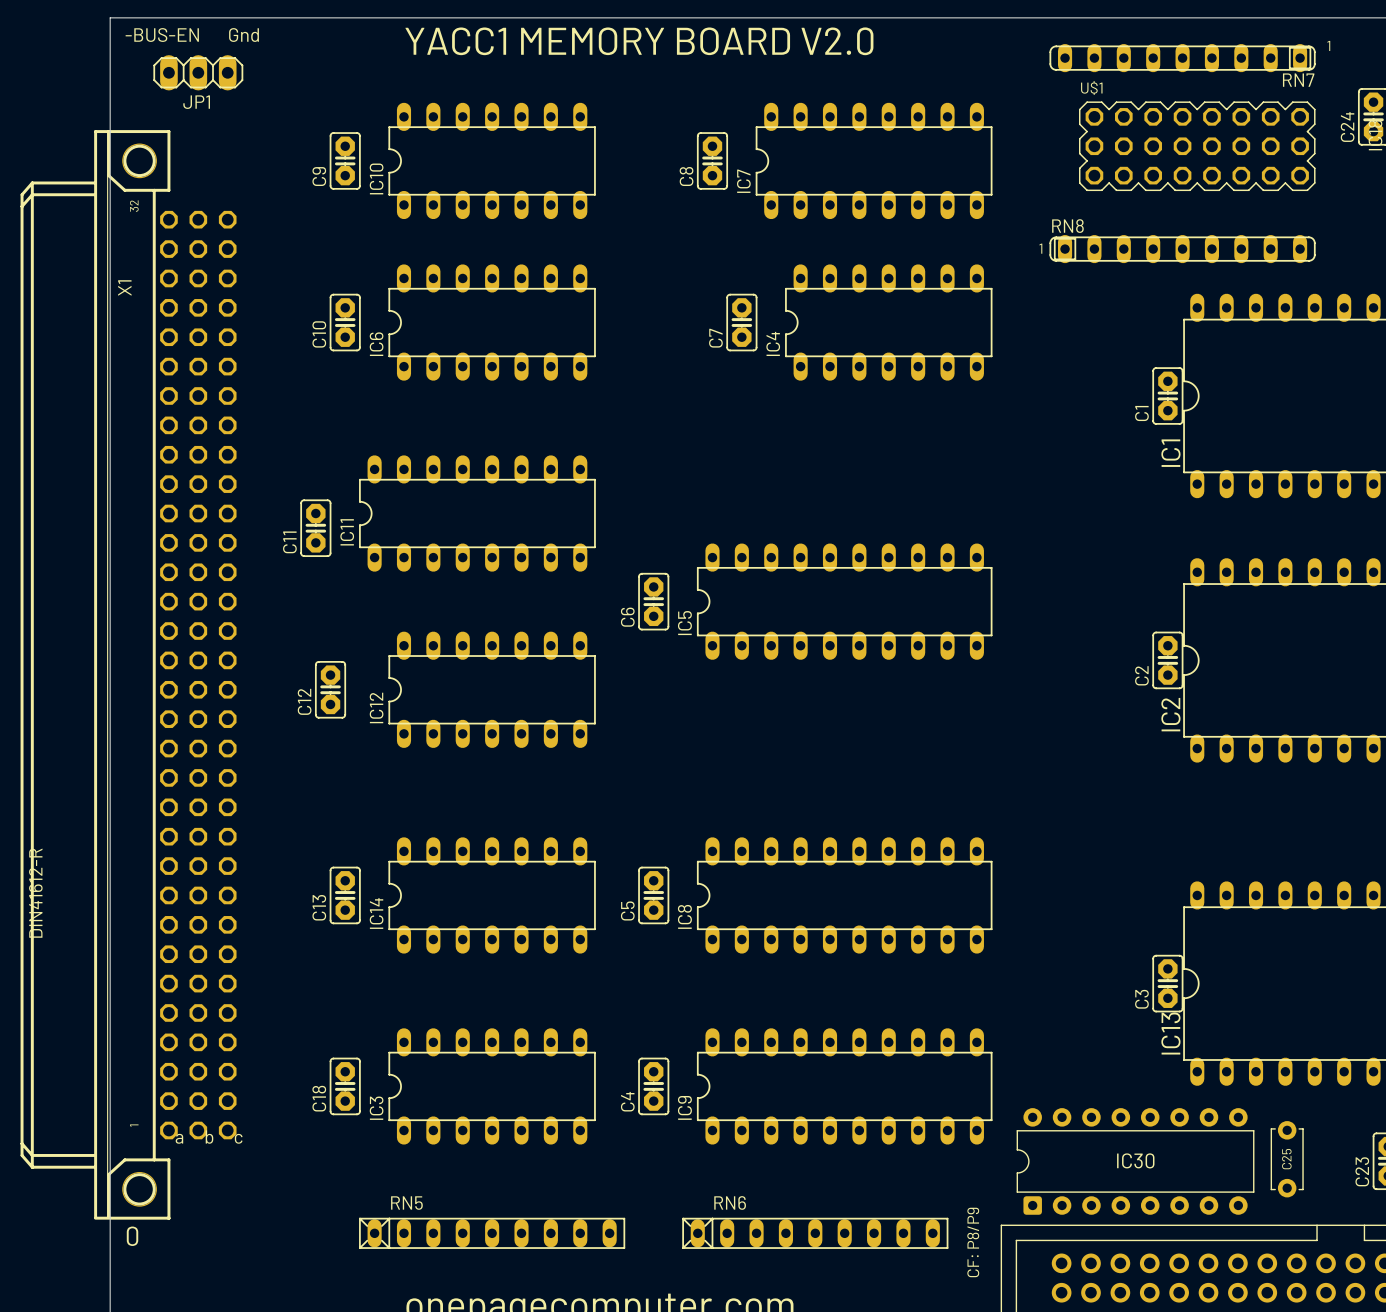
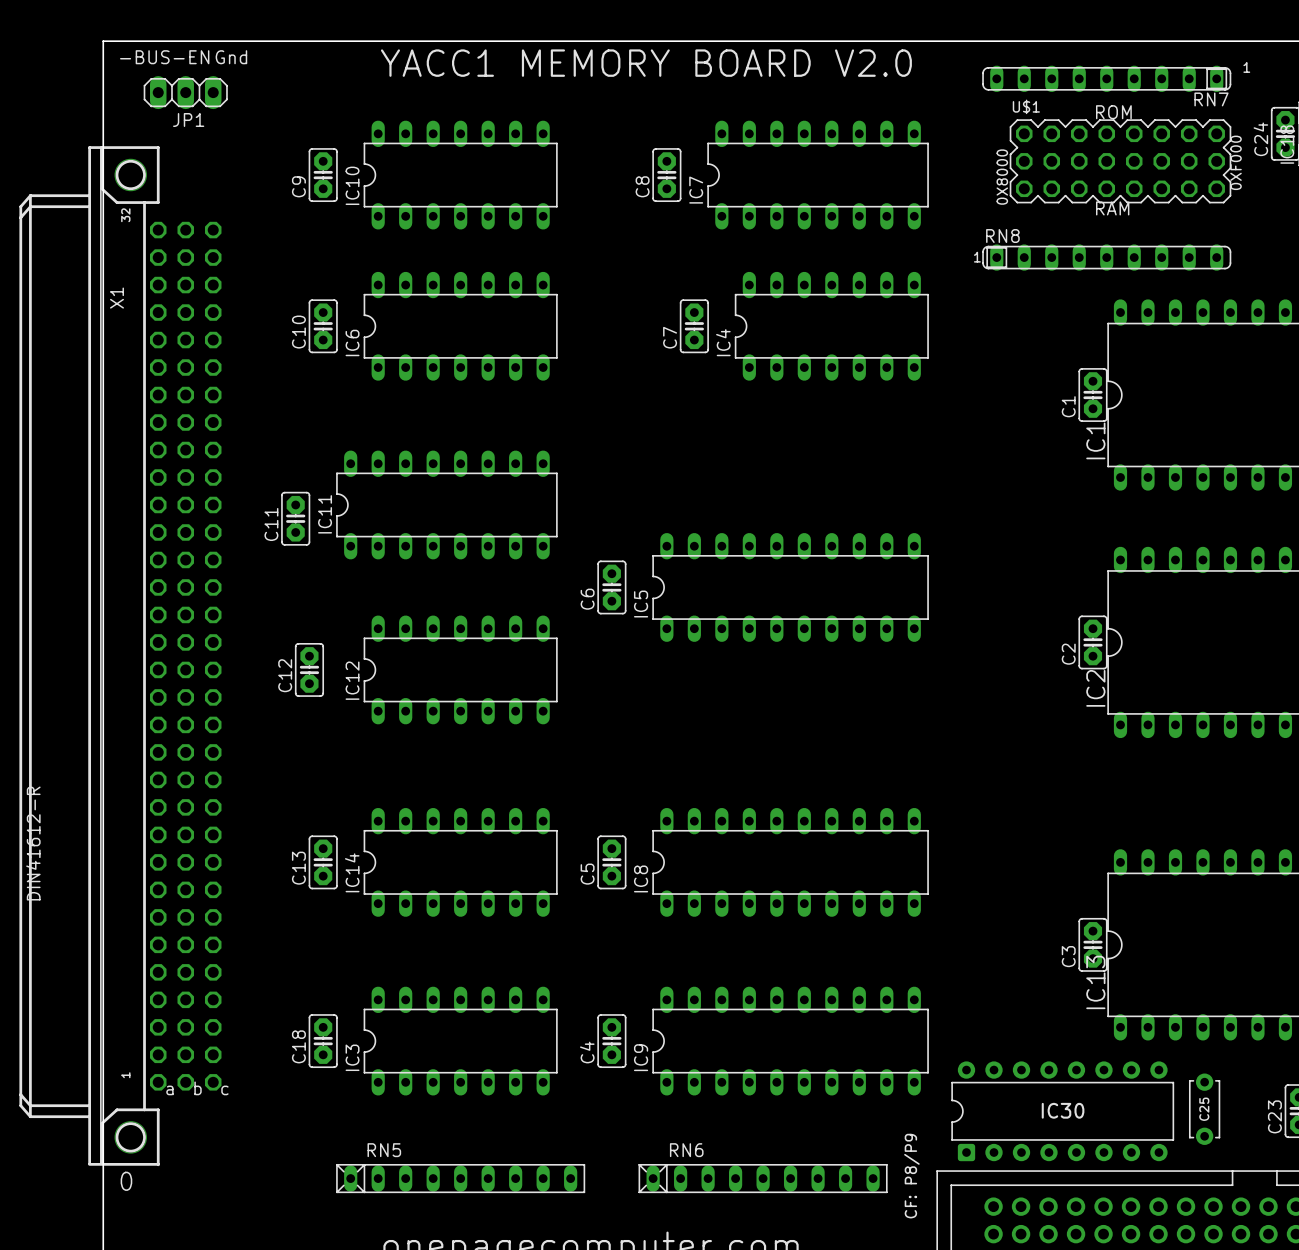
text: none -> ROM (1113, 112)
text: none -> 0XF000 (1236, 162)
text: none -> 0X8000 (1002, 177)
text: none -> RAM (1112, 208)

